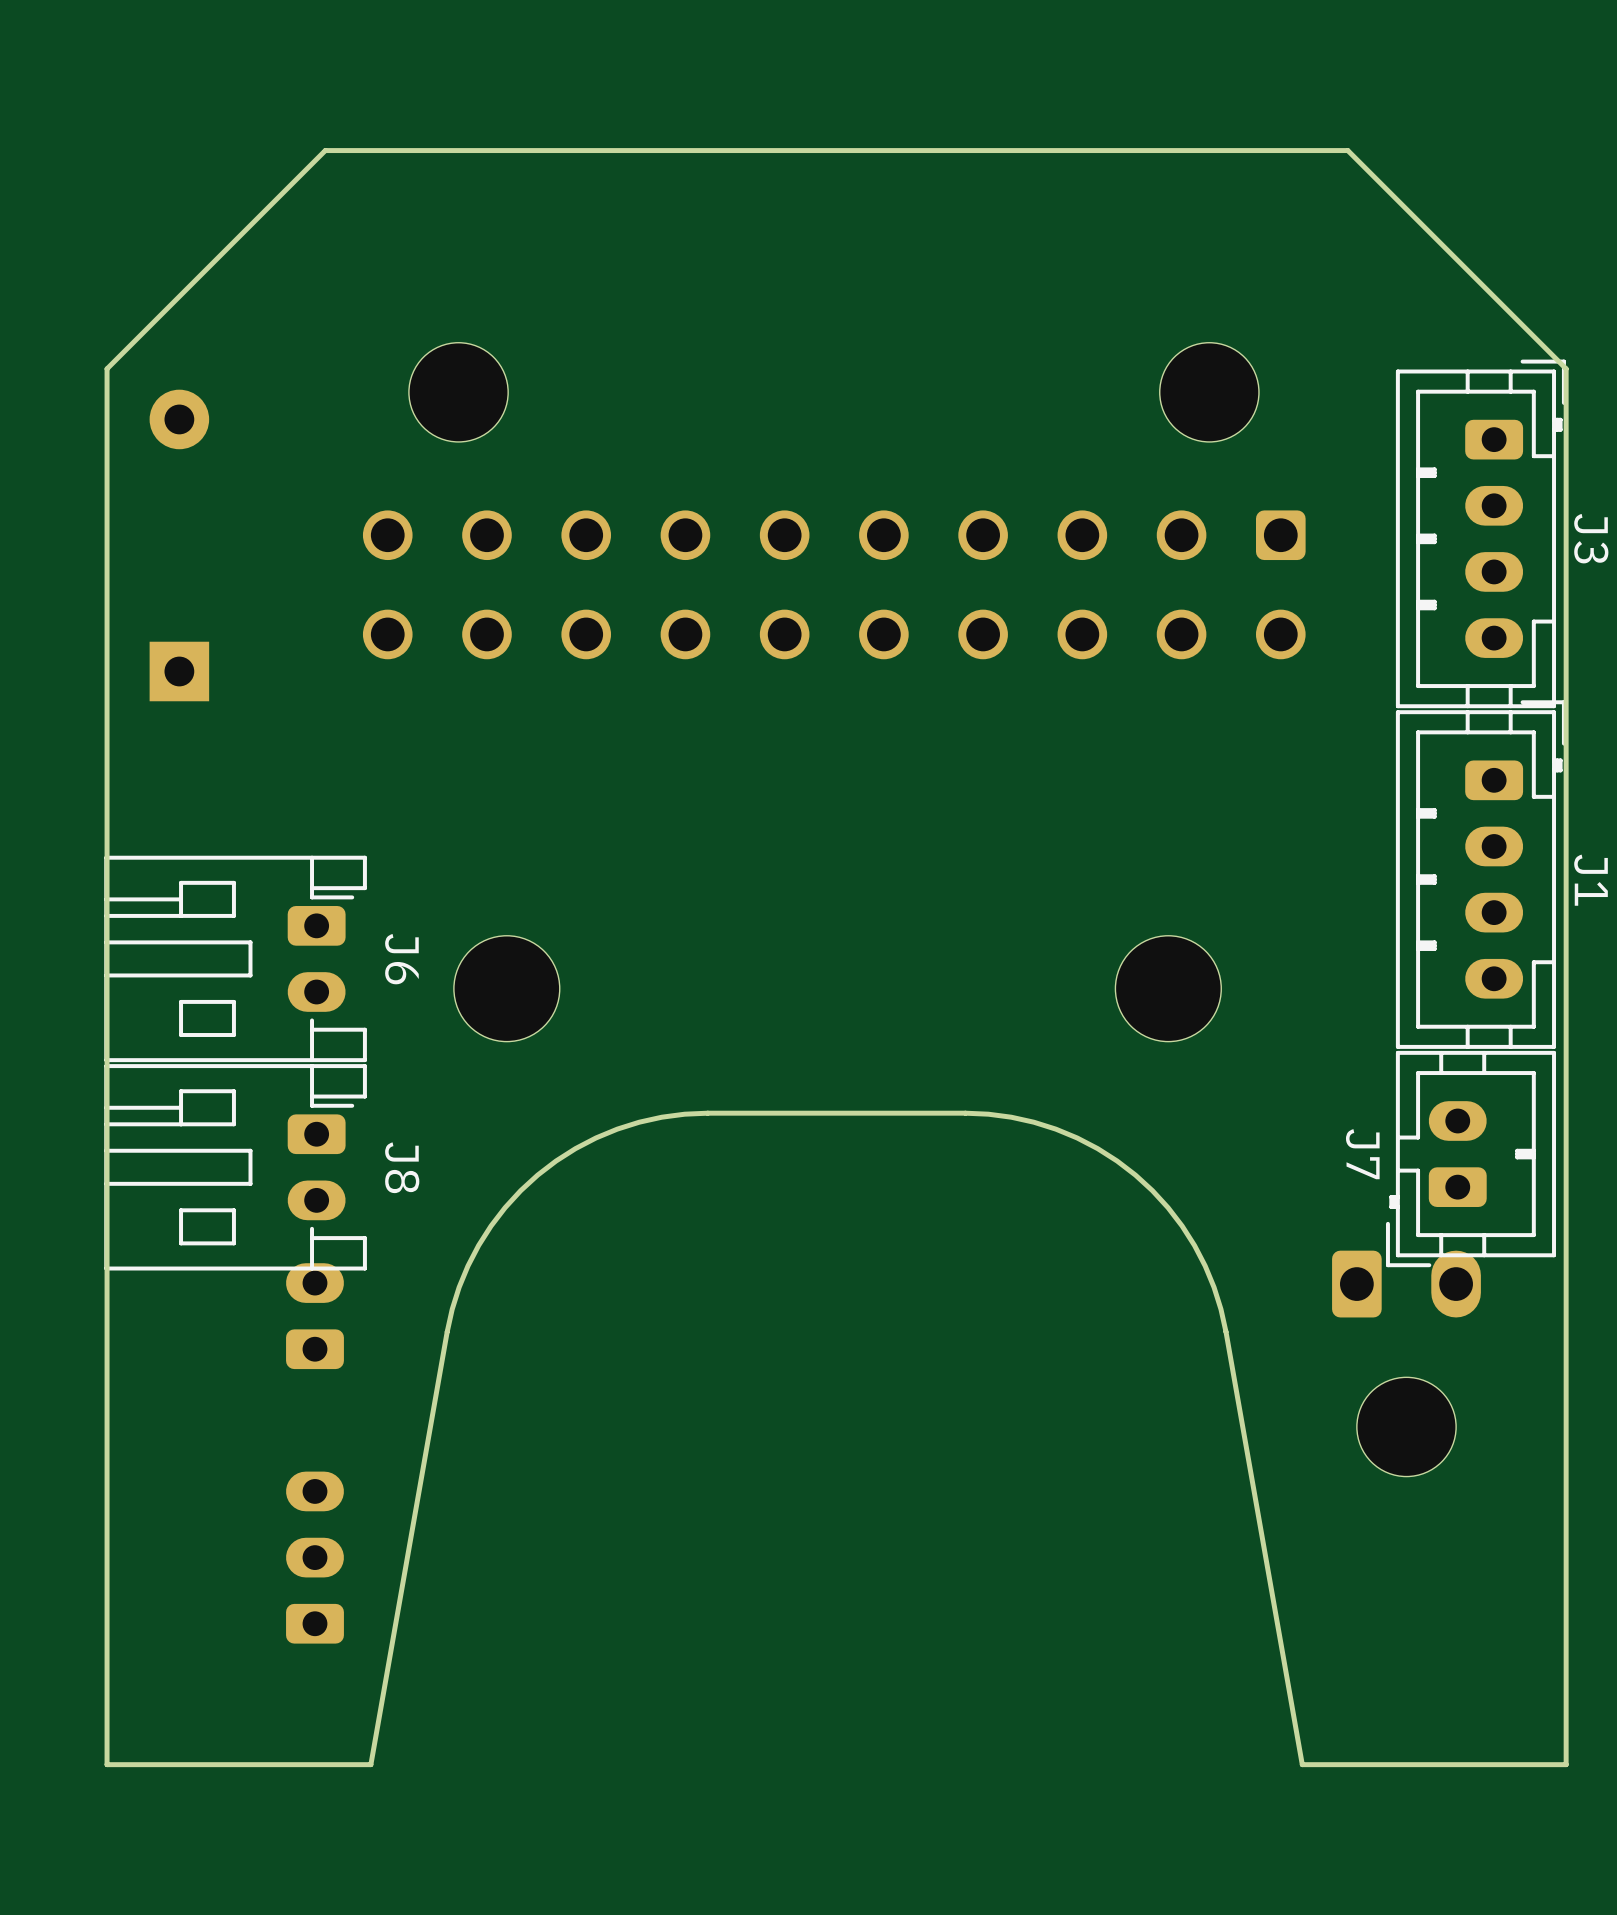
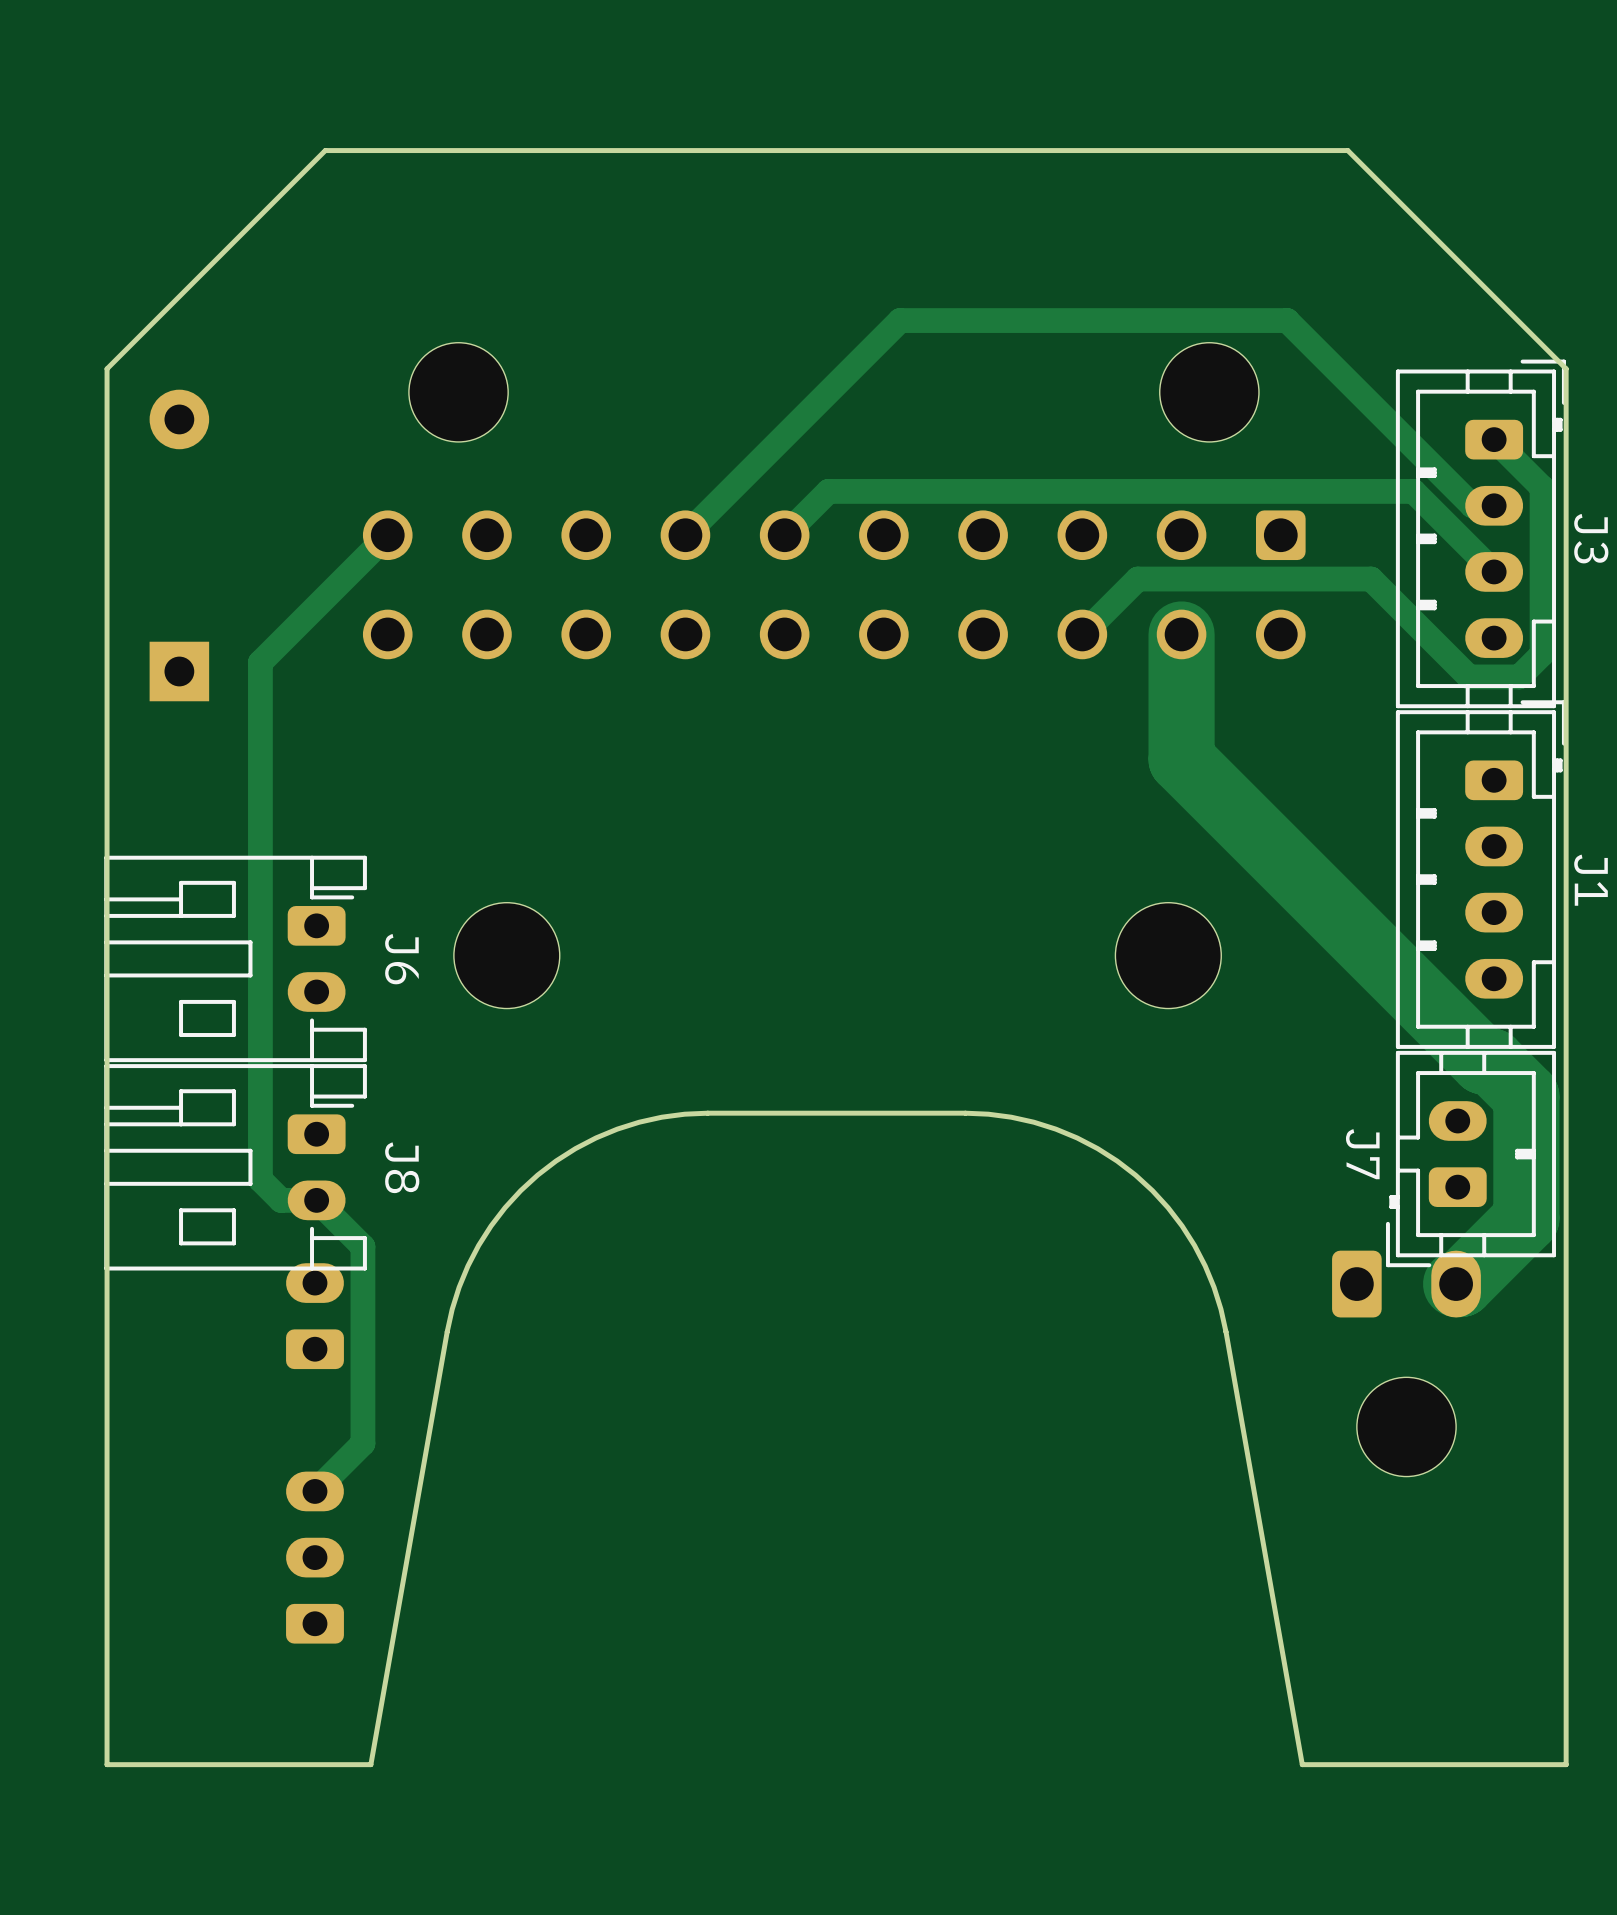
track: none -> (1494, 439) (1542, 487) (1542, 654) (1519, 676) (1468, 676) (1371, 579) (1137, 579) (1082, 634)
track: none -> (1494, 505) (1472, 505) (1287, 320) (900, 320) (685, 535)
track: none -> (387, 535) (260, 662) (260, 1179) (281, 1200) (316, 1200) (362, 1246) (362, 1443) (314, 1491)
track: none -> (784, 535) (828, 491) (1413, 491) (1494, 571)
track: none -> (1181, 634) (1181, 759) (1483, 1061) (1491, 1061) (1526, 1096) (1526, 1218) (1460, 1284) (1456, 1284)
part position: (506, 988) -> (506, 955)
part position: (1168, 988) -> (1168, 955)

